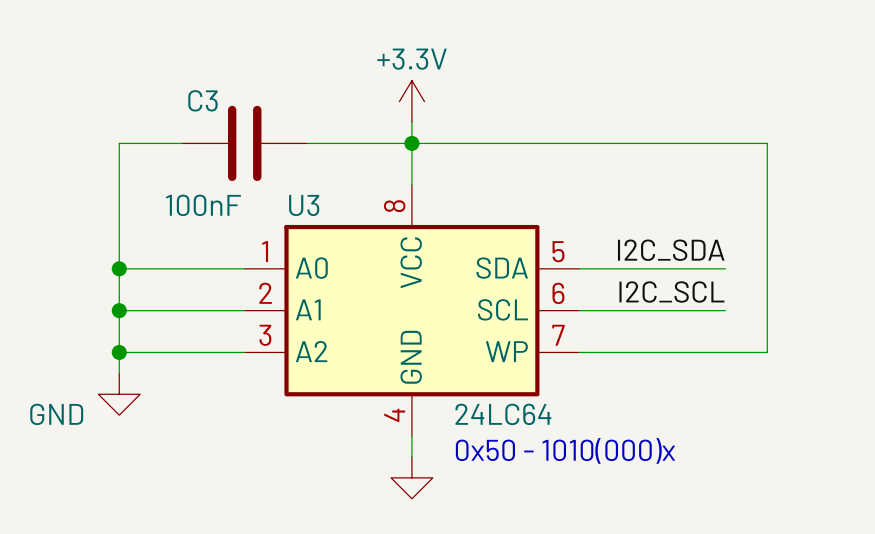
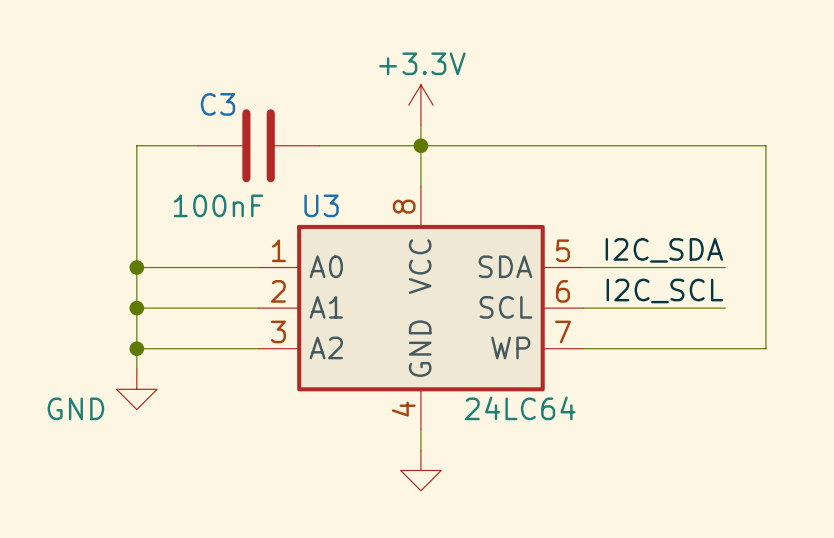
text: 0x50 - 1010(000)x (565, 450) -> none

